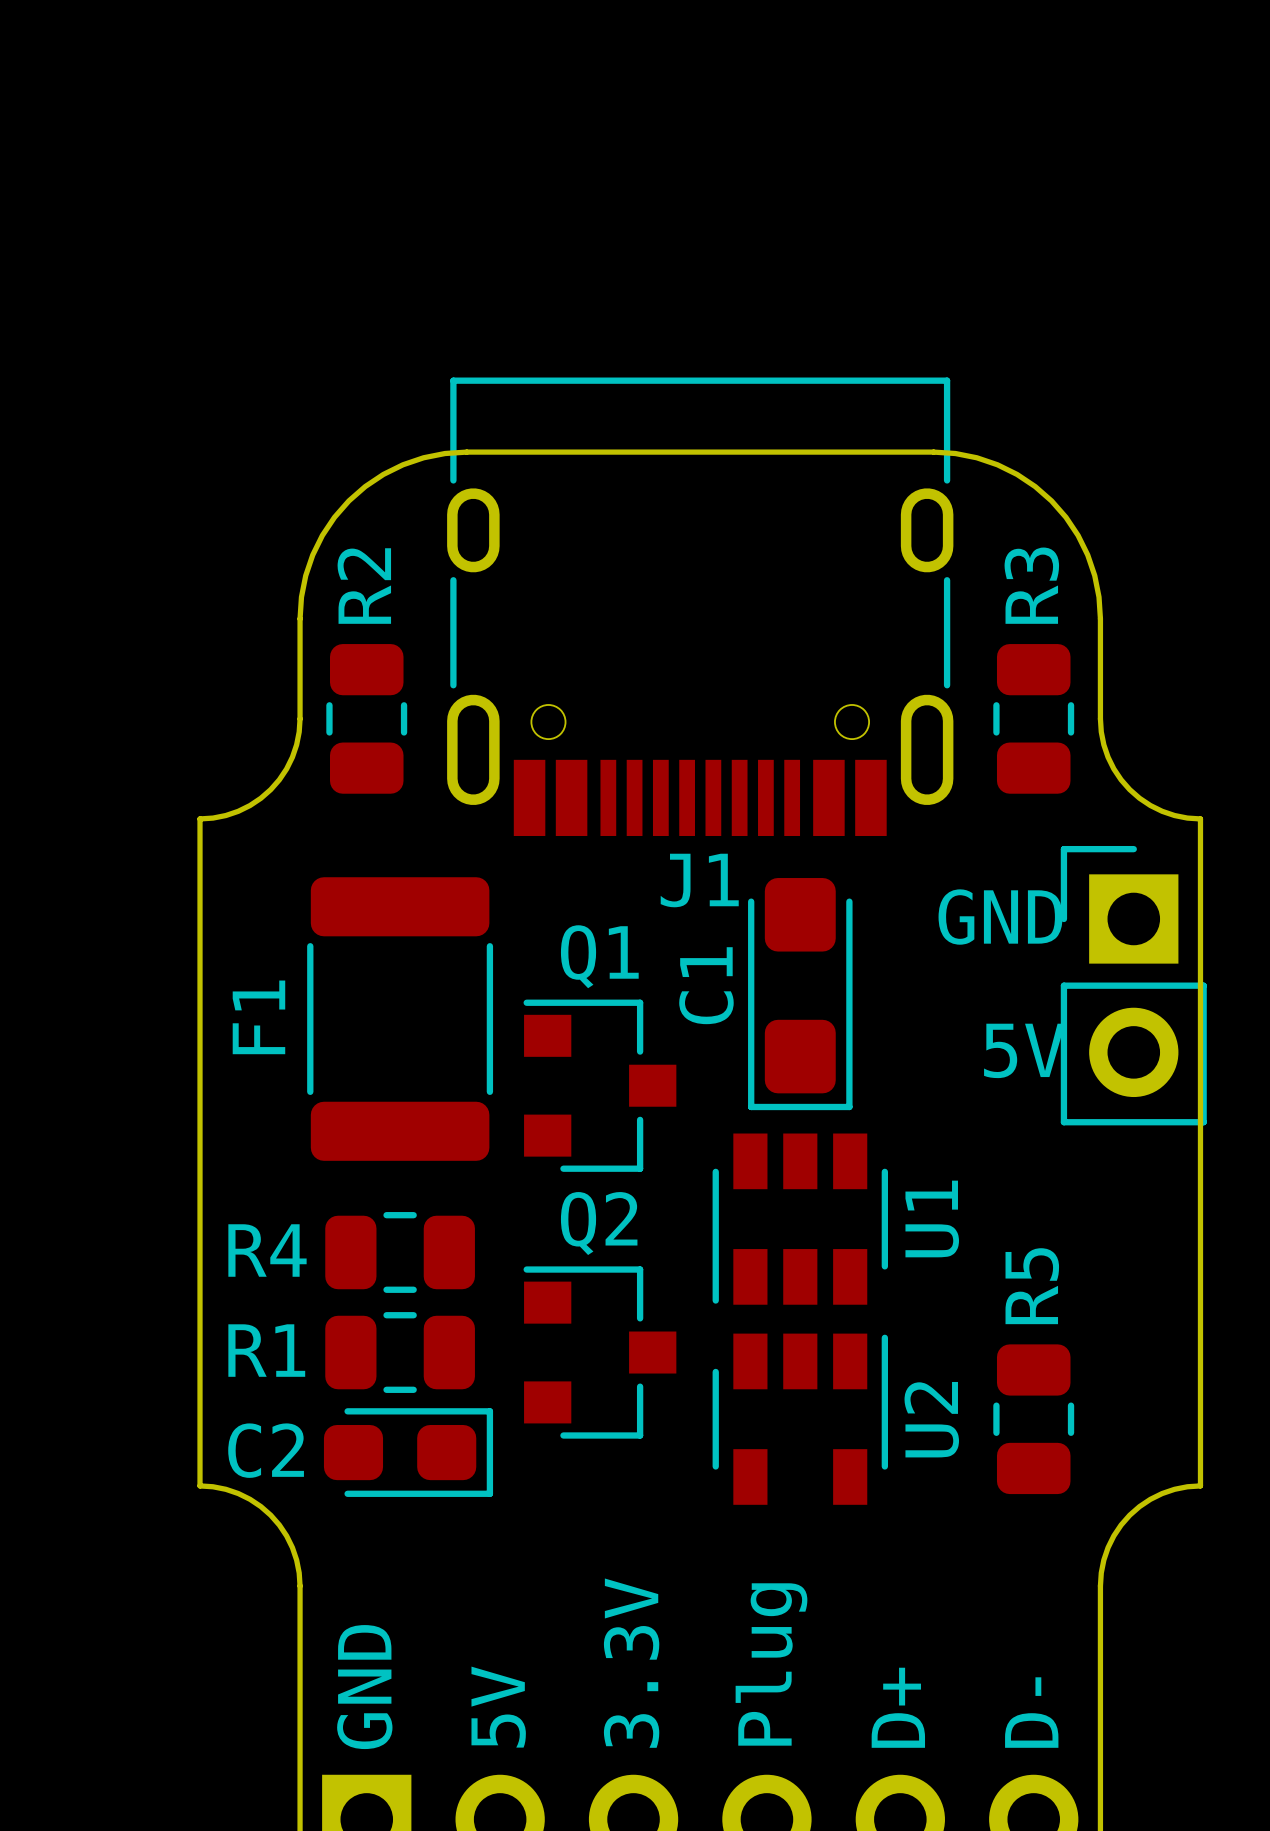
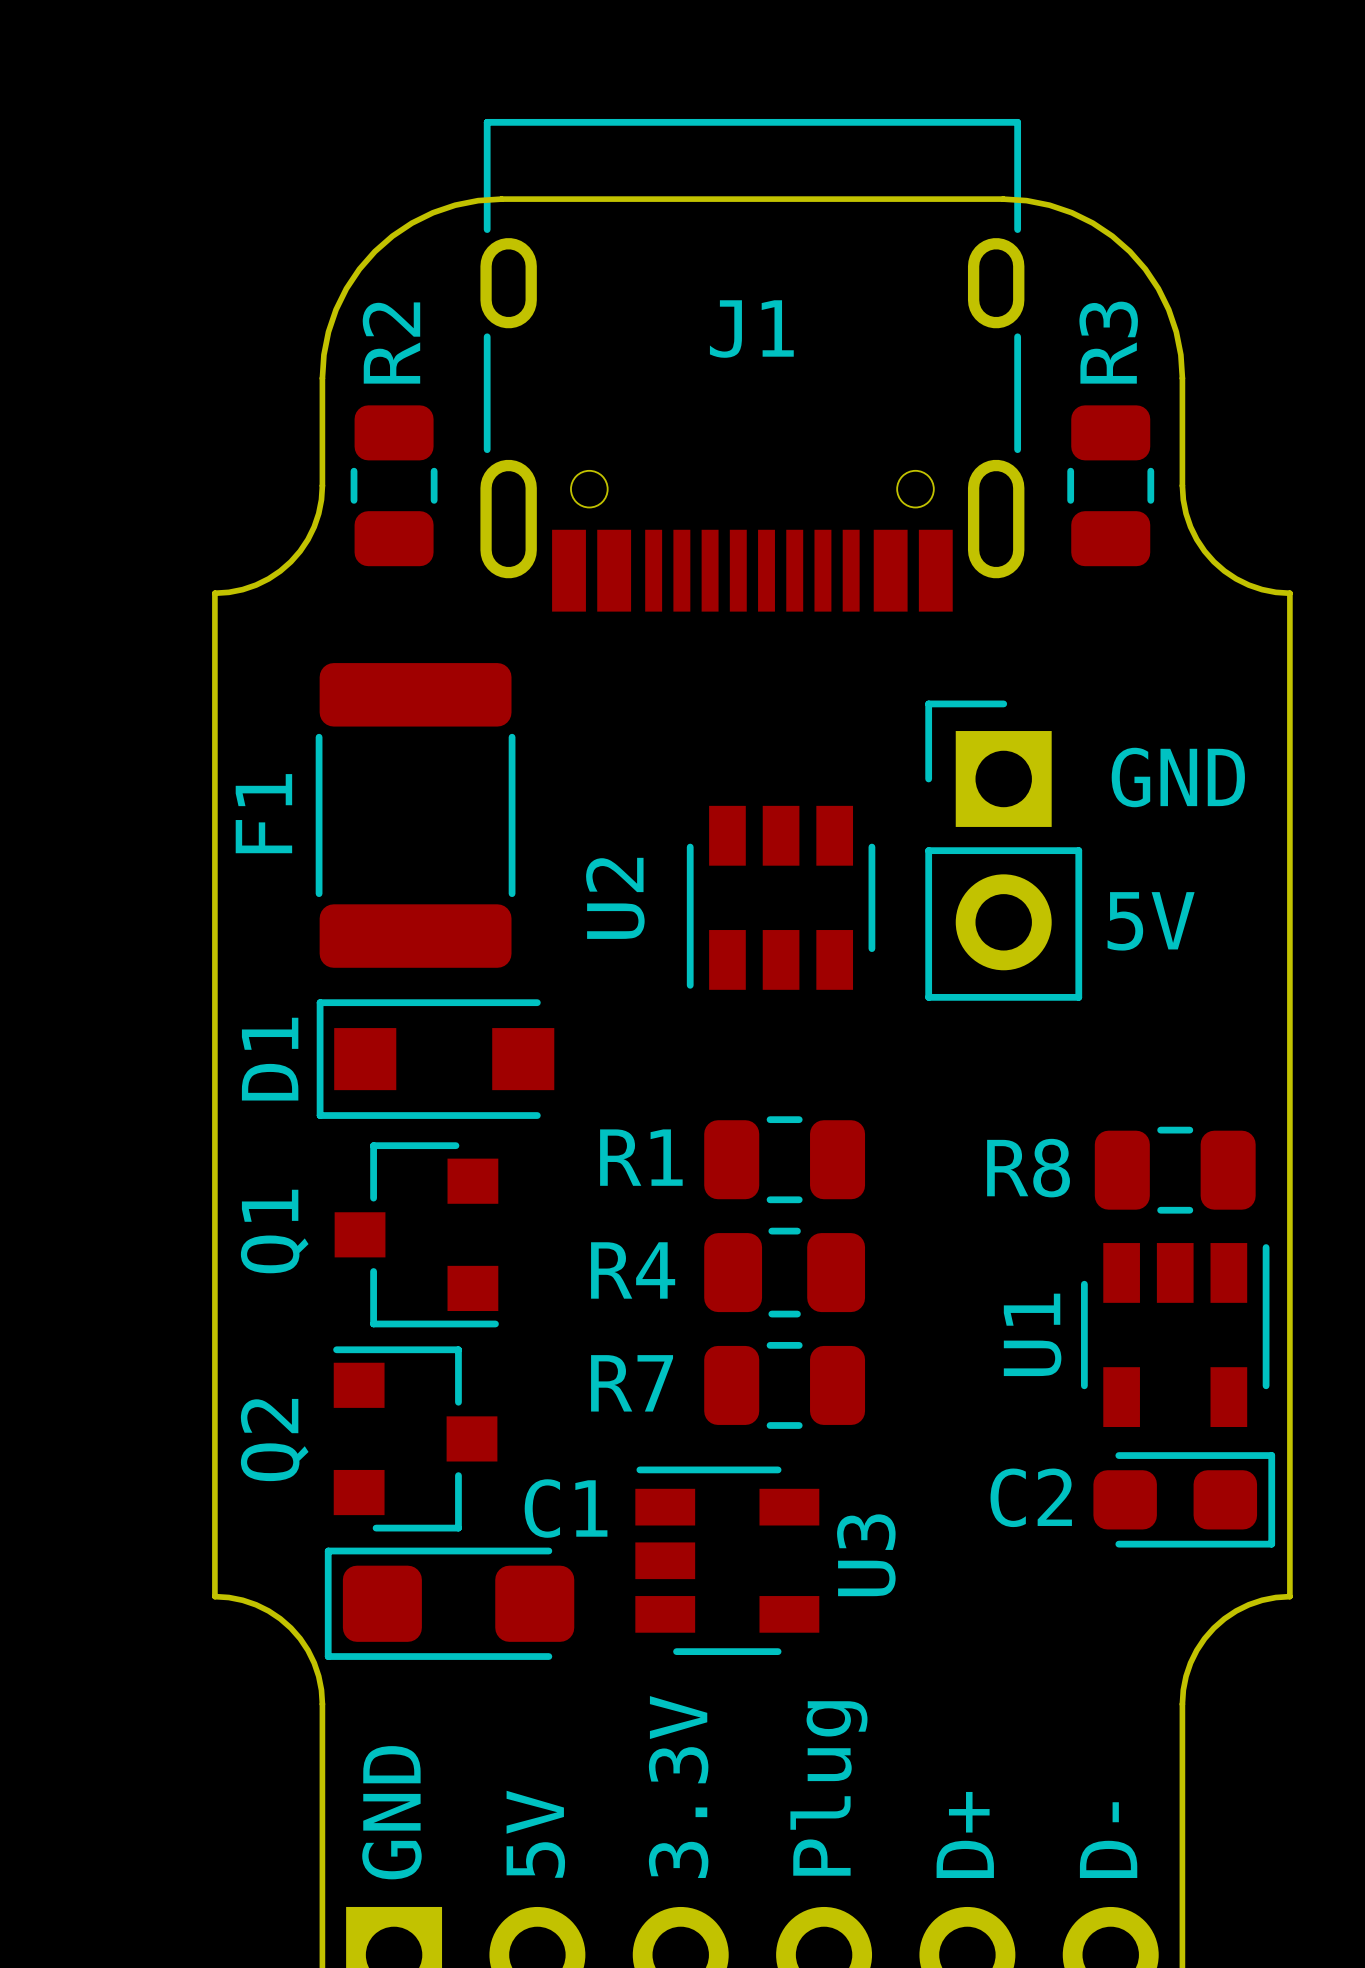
J1 position: (700, 606) -> (752, 365)
R2 position: (366, 718) -> (394, 485)
R3 position: (1033, 718) -> (1110, 485)
board edge: (200, 818) (225, 815) (250, 805) (270, 789) (286, 768) (292, 757) (299, 731) (300, 718) (301, 597) (312, 555) (334, 517) (365, 486) (402, 464) (423, 457) (466, 452) (933, 452) (976, 457) (1017, 474) (1035, 486) (1065, 517) (1078, 535) (1094, 575) (1100, 618) (1101, 731) (1103, 744) (1113, 768) (1129, 789) (1150, 805) (1174, 815) (1200, 818) -> (214, 879) (214, 593) (242, 589) (268, 578) (290, 561) (308, 539) (314, 526) (321, 499) (322, 485) (323, 354) (328, 331) (336, 309) (346, 288) (359, 269) (374, 251) (392, 236) (411, 223) (433, 212) (455, 205) (478, 200) (501, 199) (1003, 199) (1026, 200) (1049, 205) (1071, 212) (1092, 223) (1112, 236) (1129, 251) (1145, 269) (1158, 288) (1168, 309) (1176, 331) (1180, 354) (1182, 378) (1183, 499) (1186, 513) (1196, 539) (1213, 561) (1236, 578) (1262, 589) (1289, 593) (1289, 879)
J1 name position: J1 (699, 880) -> J1 (751, 329)
text position: GND (1000, 917) -> GND (1178, 777)
Q1 name position: Q1 (599, 956) -> Q1 (274, 1231)
D1: none -> (435, 1059)
part position: (1133, 985) -> (1003, 850)
C1 rotation: 0° (800, 994) -> 90° clockwise (449, 1603)
C1 position: (800, 994) -> (449, 1603)
F1 position: (400, 1019) -> (415, 815)
text position: 5V (1024, 1050) -> 5V (1151, 921)
Q1 rotation: 0° (599, 1085) -> 180° (416, 1234)
Q1 position: (599, 1085) -> (416, 1234)
R8: none -> (1175, 1170)
U1 footprint: [712, 1133, 889, 1305] -> [1081, 1243, 1270, 1428]
R4 footprint: [325, 1212, 475, 1293] -> [704, 1227, 866, 1318]
U1 name position: U1 (932, 1218) -> U1 (1032, 1334)
Q2 name rotation: 0° (599, 1223) -> 90° counterclockwise (274, 1440)
Q2 name position: Q2 (599, 1223) -> Q2 (274, 1440)
R7: none -> (784, 1385)
U2 footprint: [712, 1333, 889, 1505] -> [686, 805, 876, 990]
R1 position: (400, 1352) -> (784, 1159)
Q2 position: (599, 1352) -> (415, 1438)
U2 name position: U2 (931, 1419) -> U2 (615, 898)
R5: (1033, 1419) -> none
C2 position: (408, 1452) -> (1184, 1499)
U3: none -> (727, 1560)

